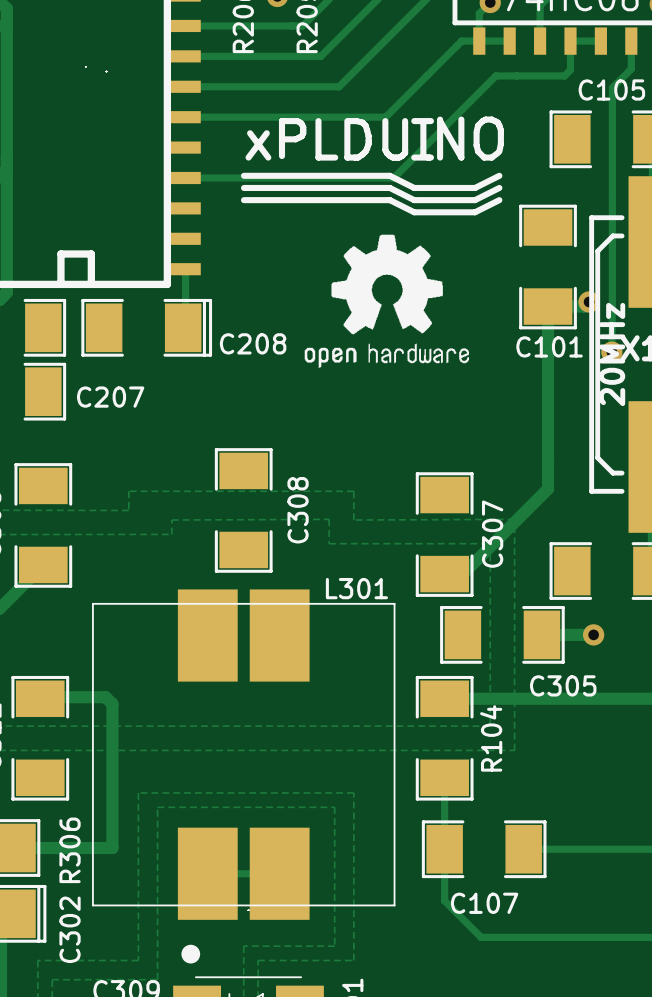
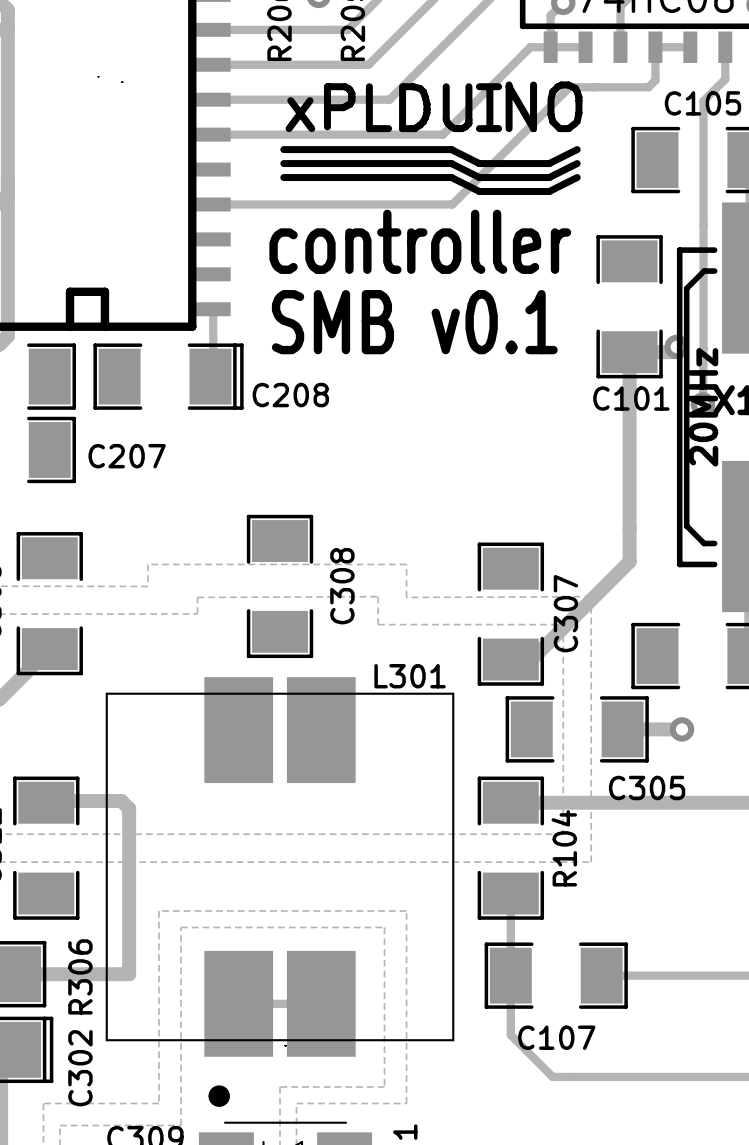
drawing position: (372, 165) -> (431, 138)
text: none -> controller (420, 241)
drawing: [304, 234, 470, 368] -> none
text: none -> SMB v0.1 (414, 322)

